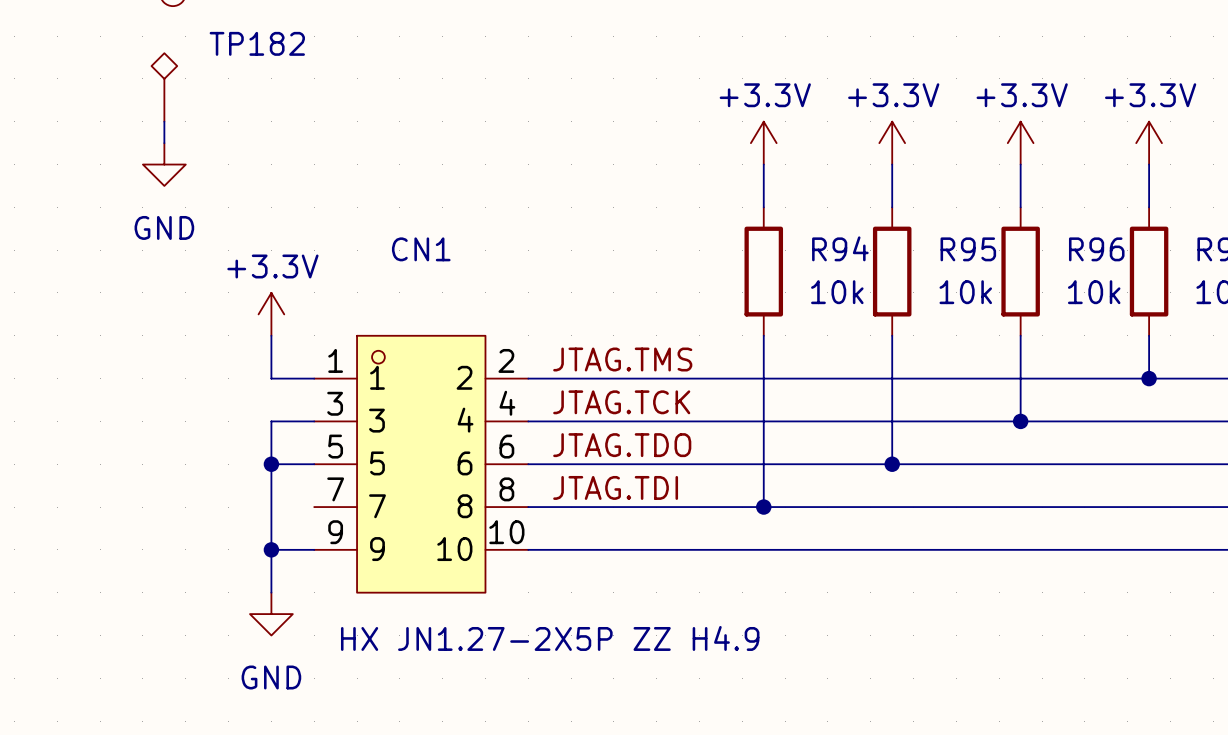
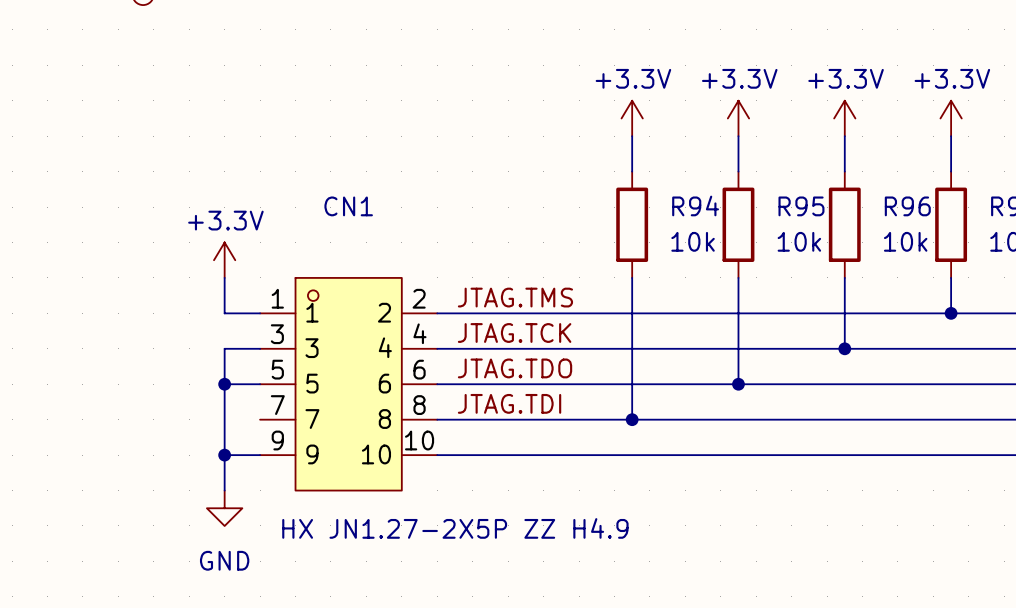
TP182: (164, 87) -> none
wire: (164, 121) (164, 143) -> none
power symbol: GND (164, 164) -> none

